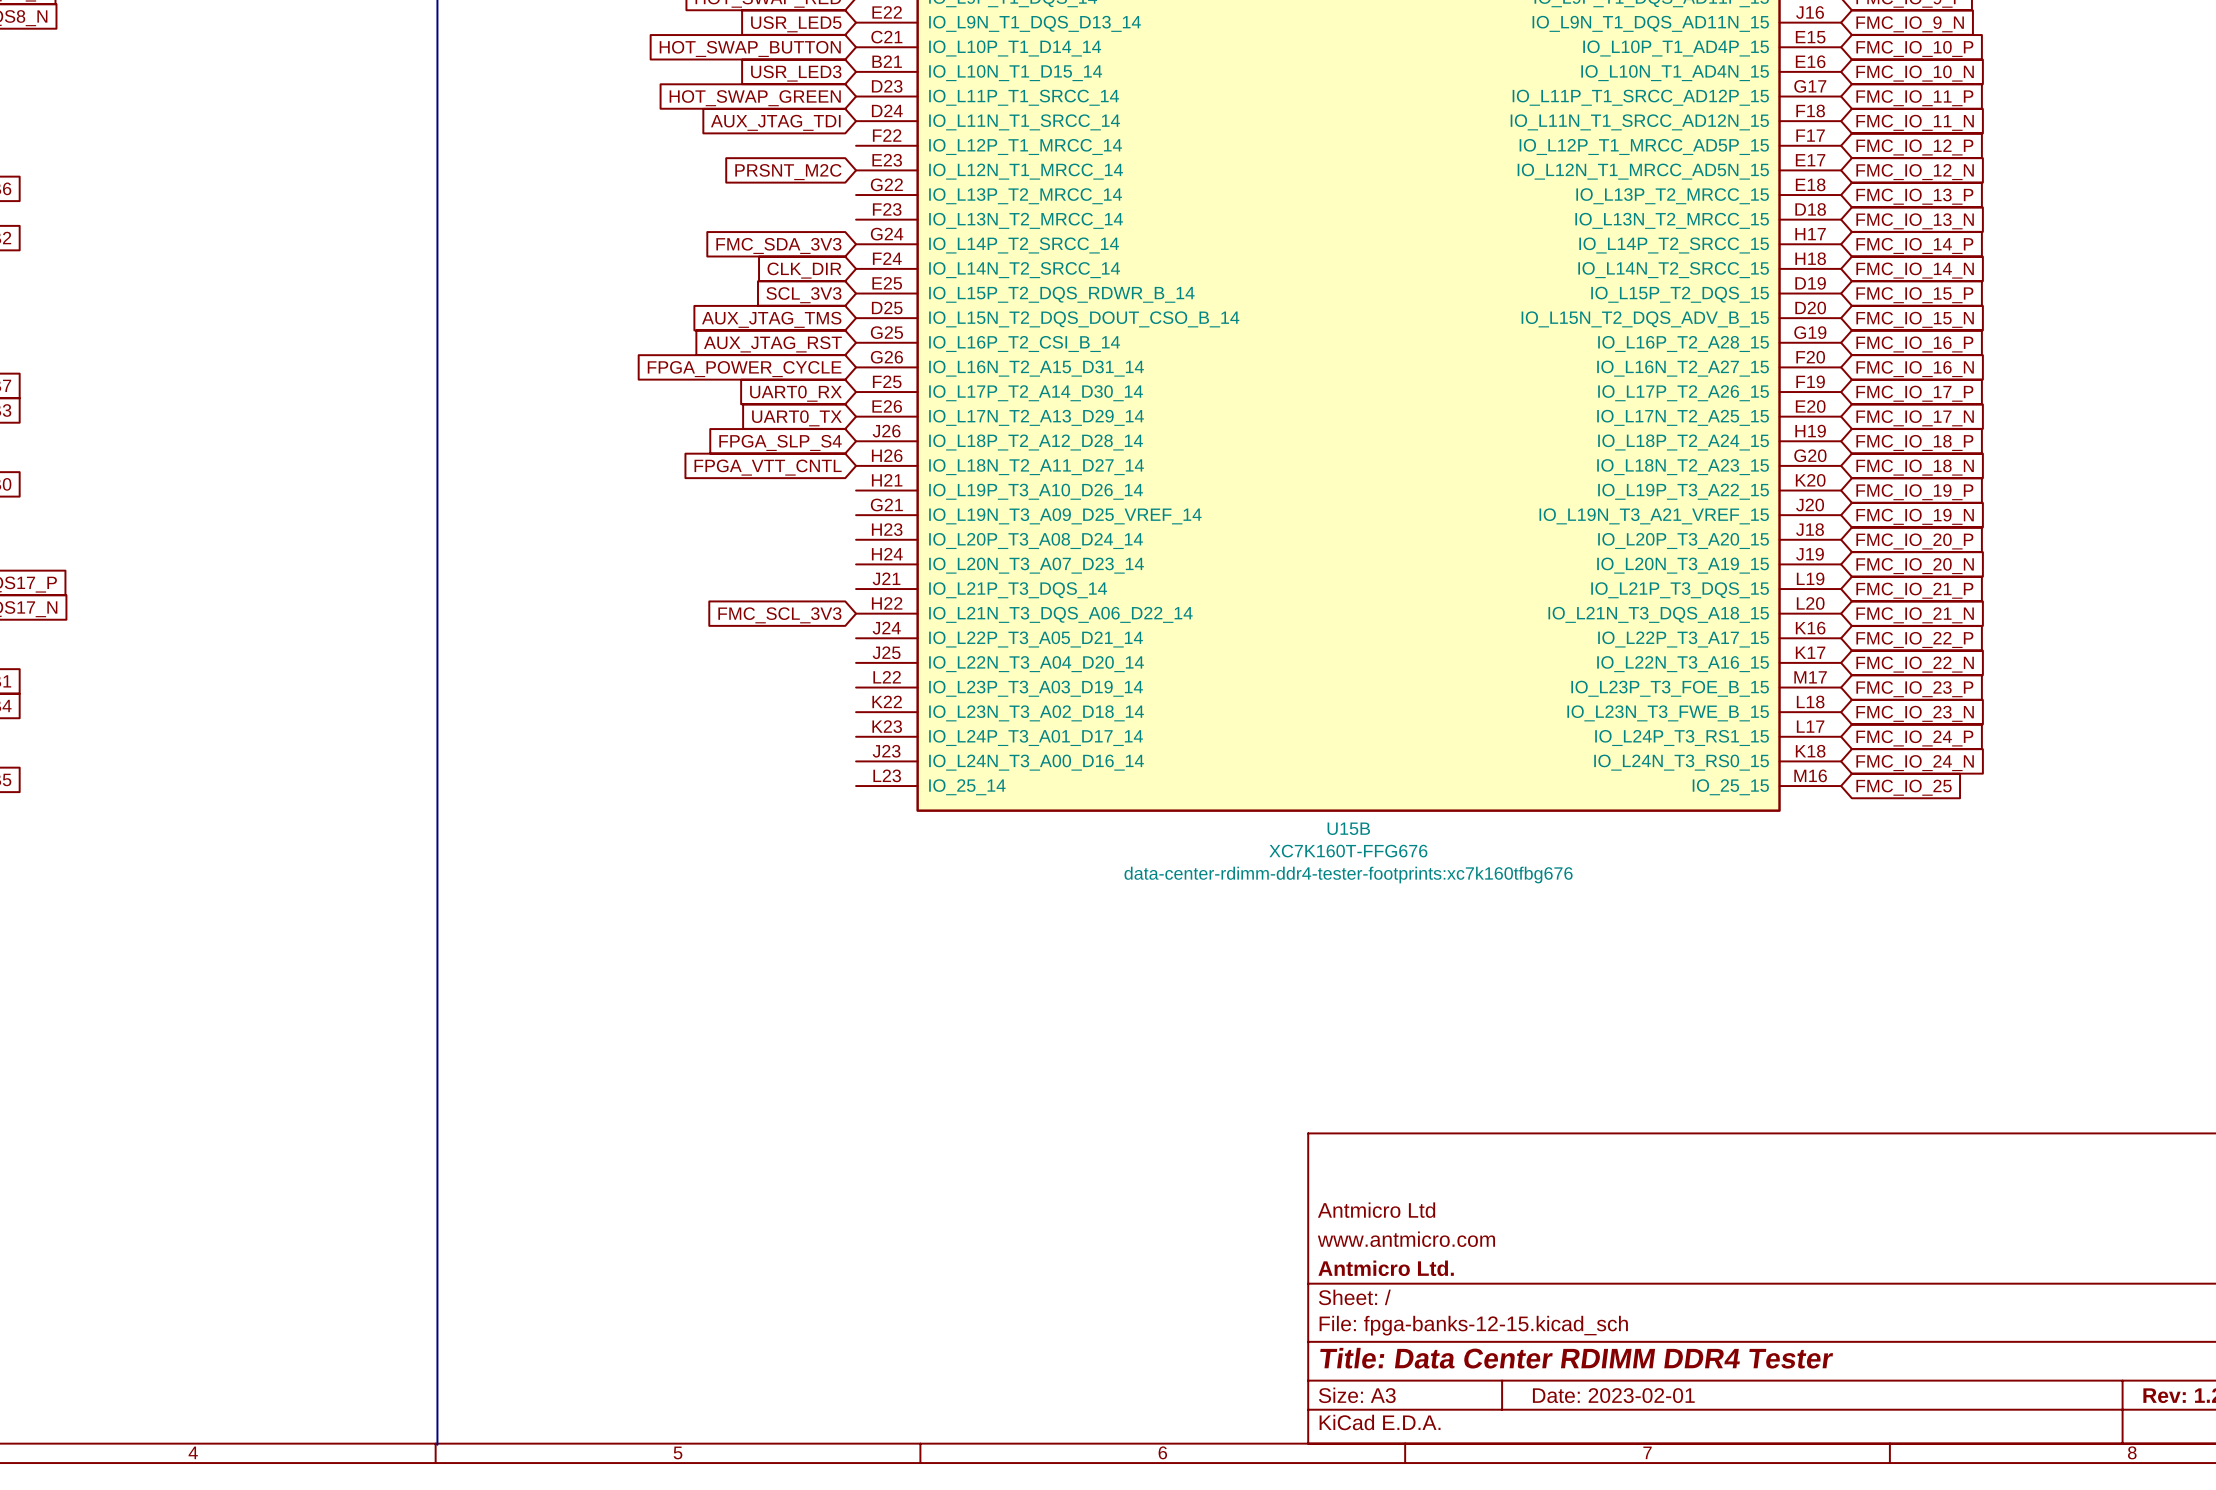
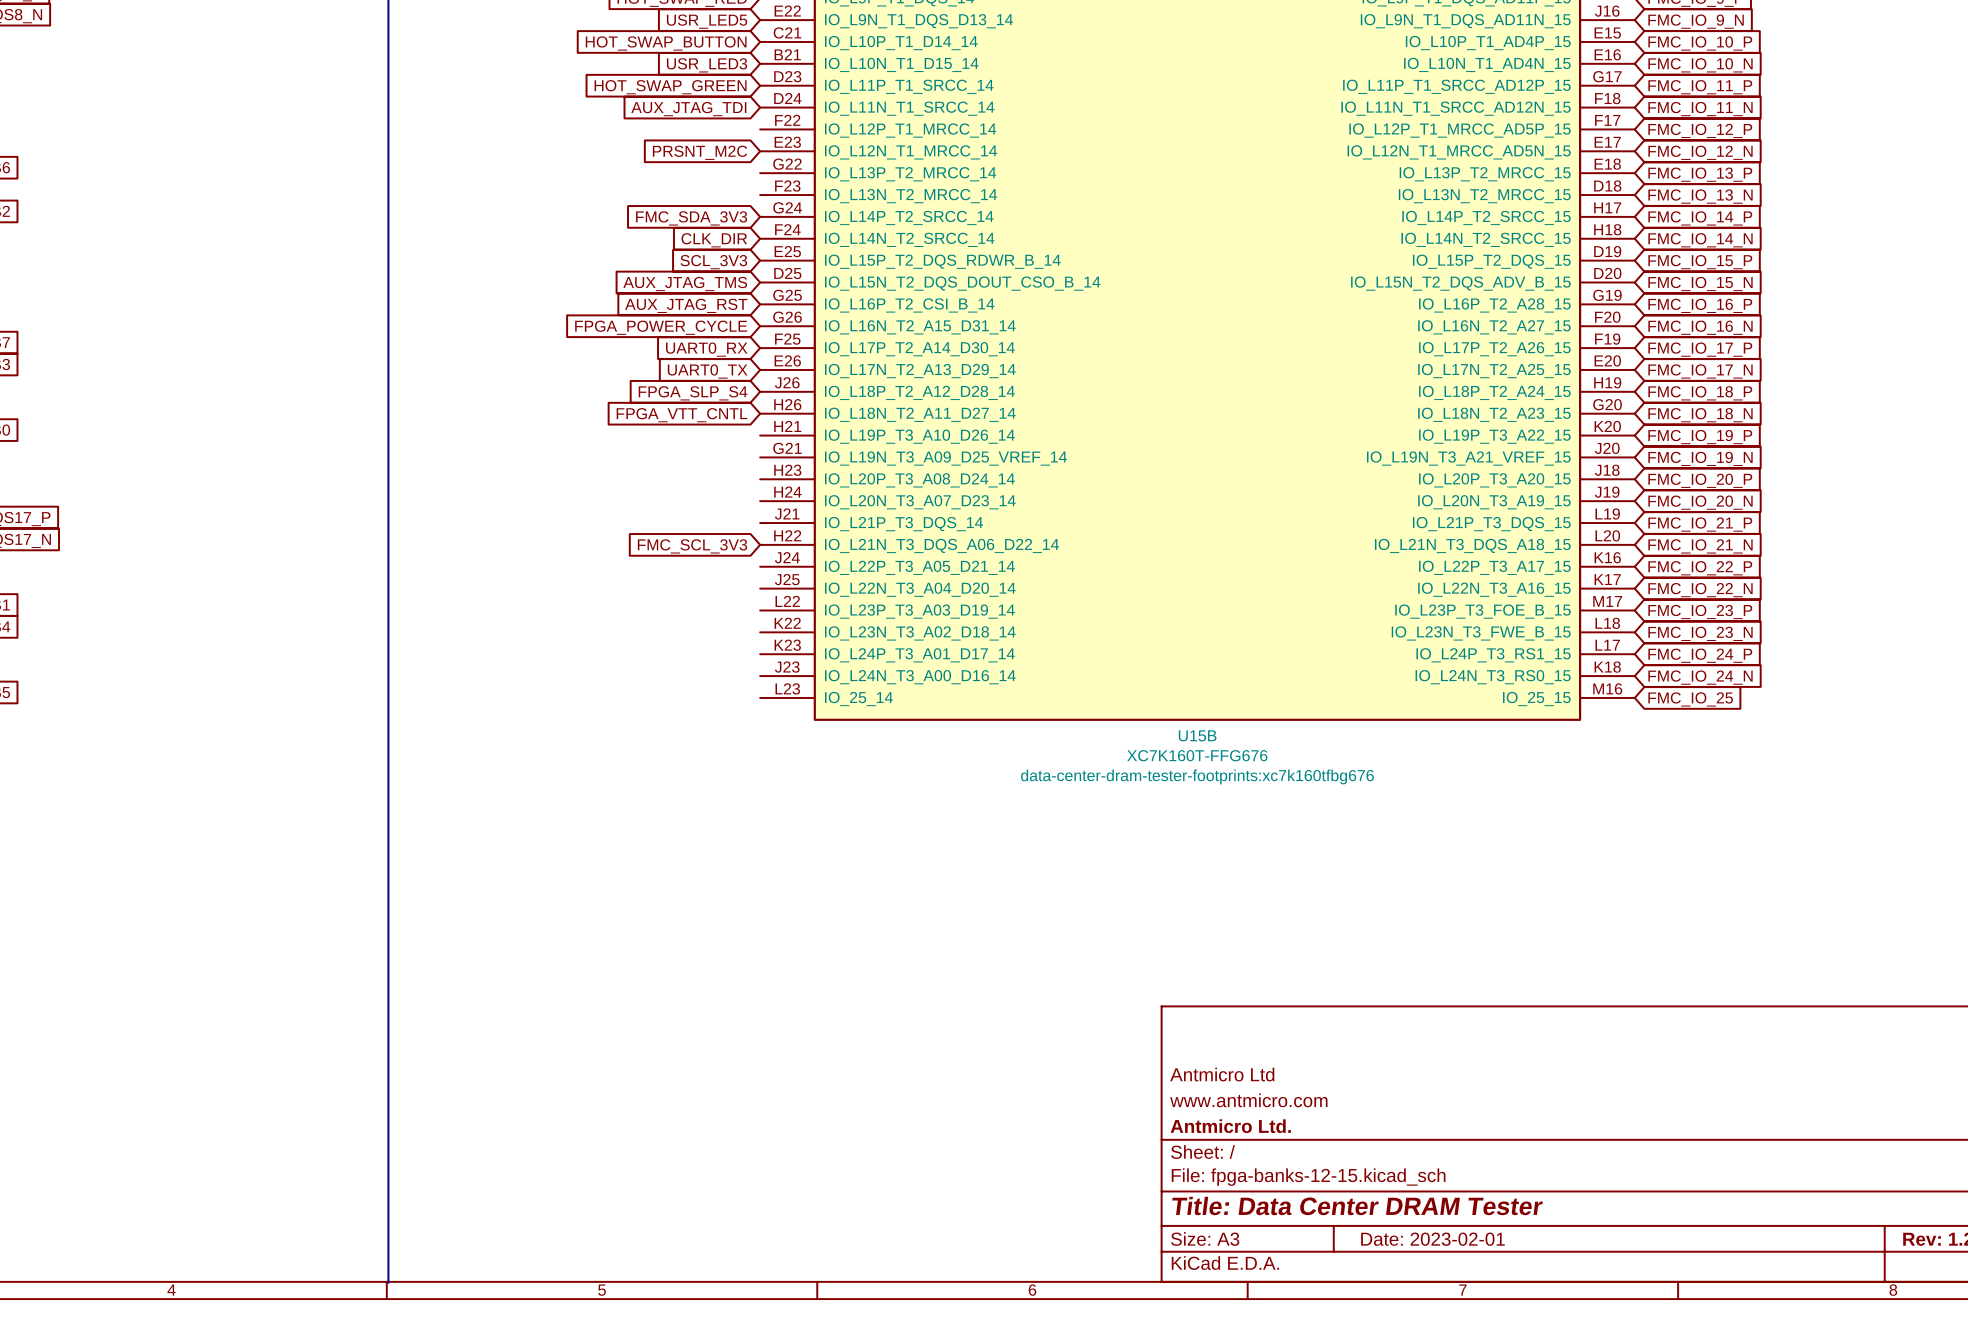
U15B text: data-center-rdimm-ddr4-tester-footprints:xc7k160tfbg676 (1348, 875) -> data-center-dram-tester-footprints:xc7k160tfbg676 (1197, 776)
title block: Title: Data Center RDIMM DDR4 Tester (1576, 1358) -> Title: Data Center DRAM Tester (1357, 1205)

